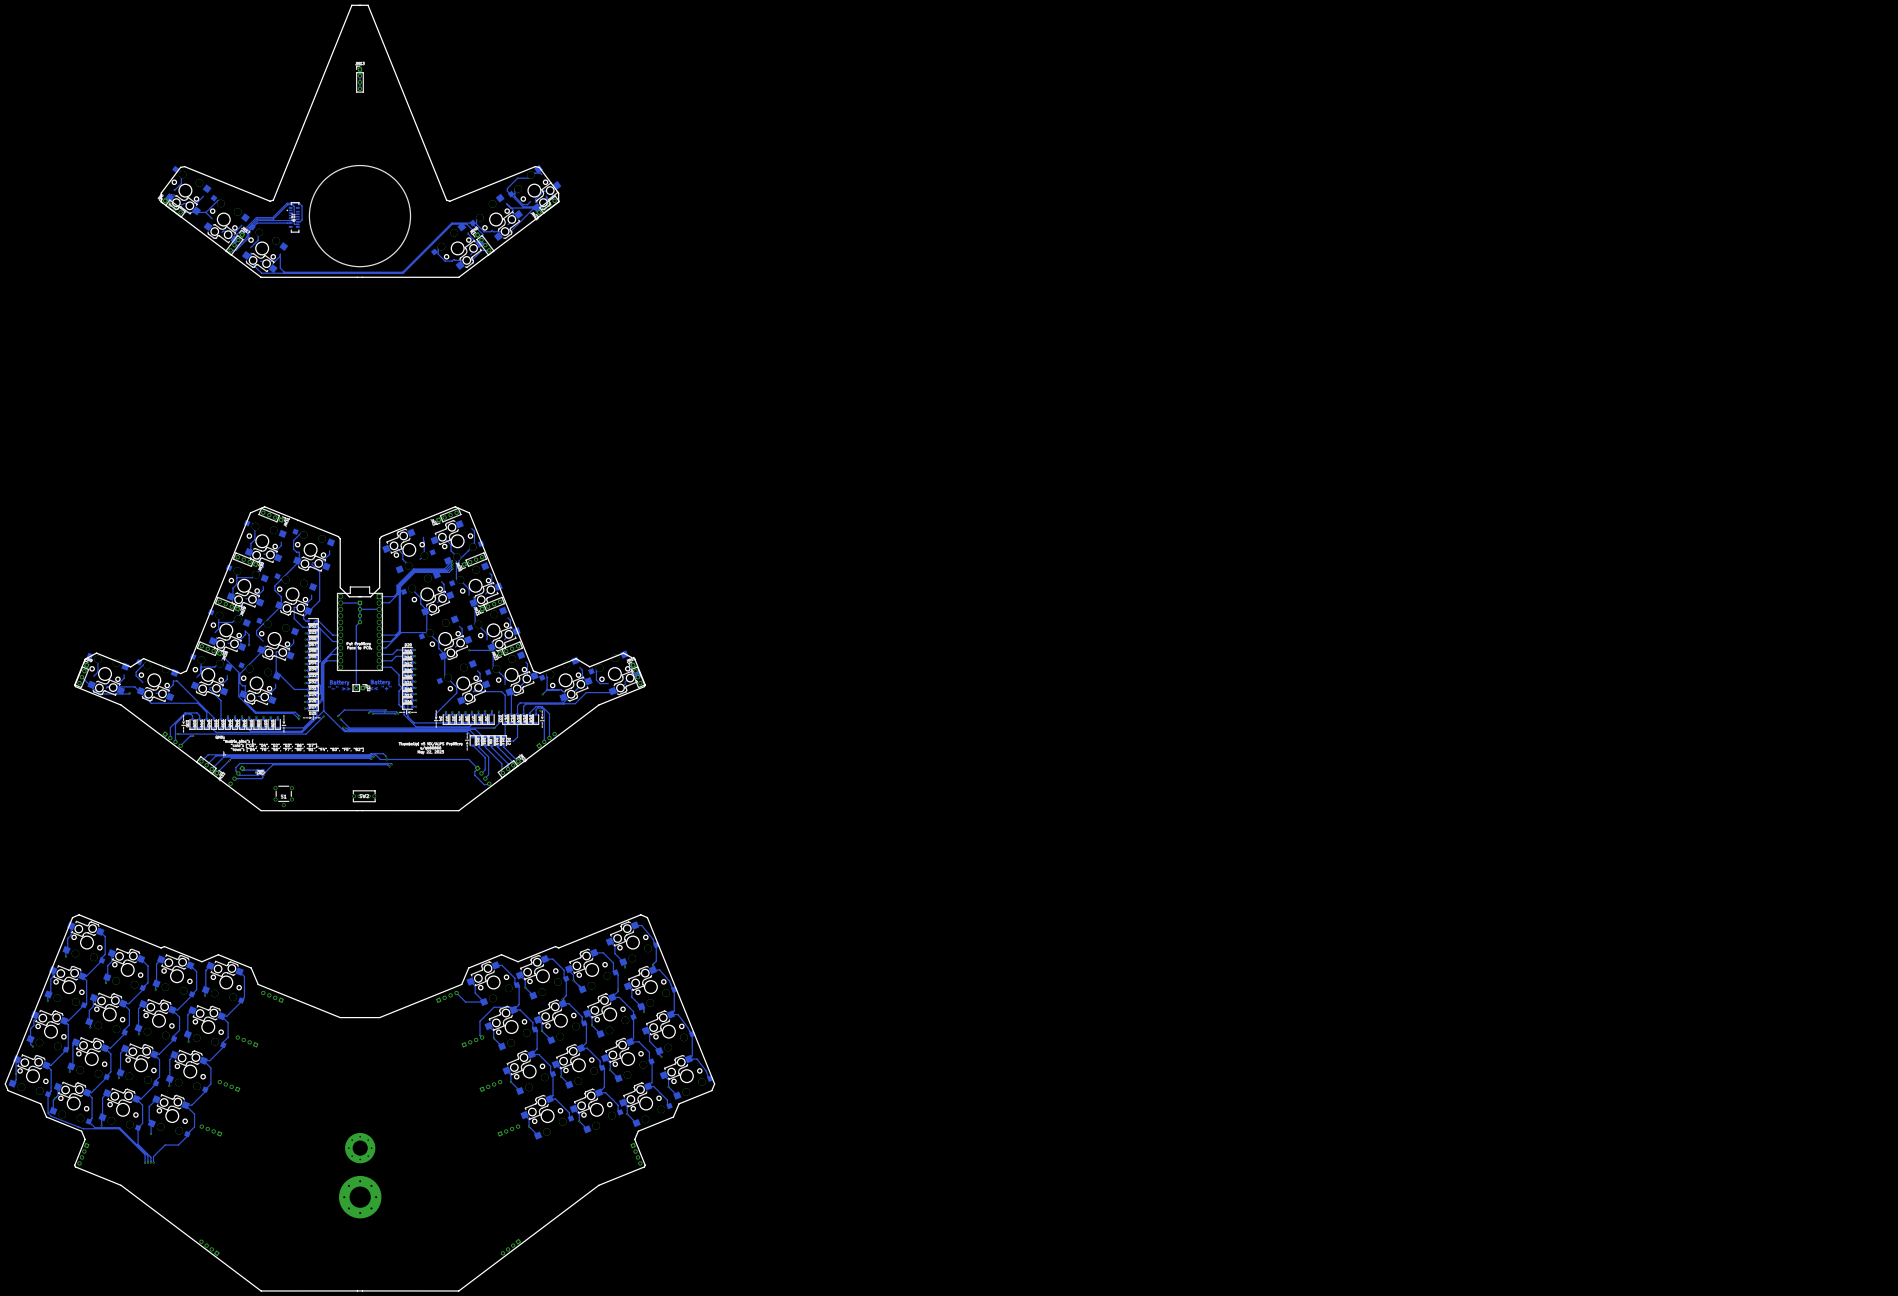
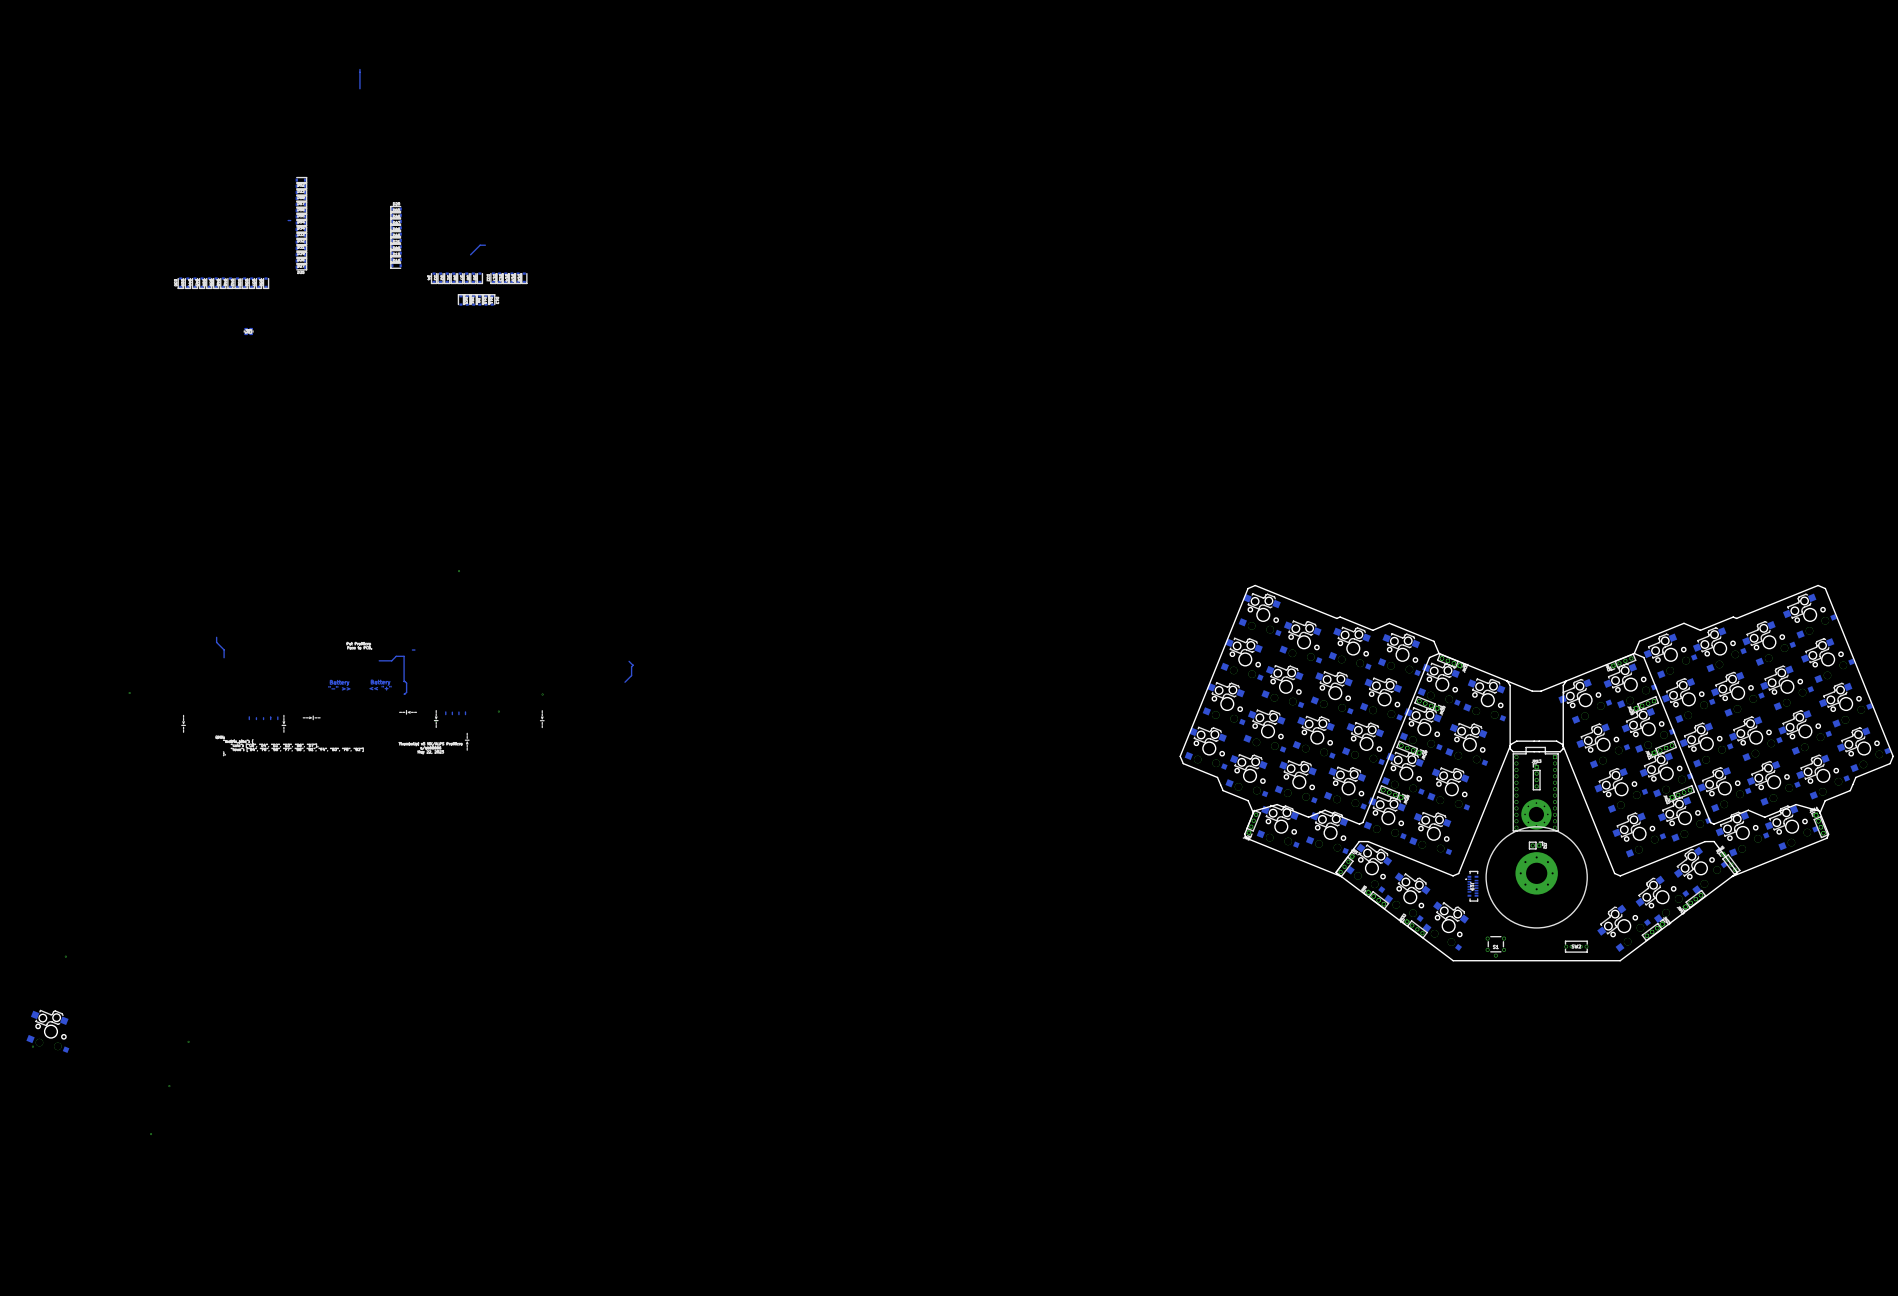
board edge: (368, 5) (351, 5) (273, 200) (270, 201) (184, 166) (180, 167) (161, 193) (161, 201) (261, 277) (458, 277) (558, 201) (558, 193) (539, 167) (535, 166) (449, 201) (446, 200) (368, 5) -> none
part position: (359, 79) -> (1536, 776)
drawing: [309, 165, 411, 267] -> none
track: (181, 171) (181, 183) (173, 189) -> none
track: (541, 174) (534, 173) (529, 178) (517, 178) (507, 188) (507, 191) (523, 206) (549, 204) (547, 202) (547, 196) -> none
part: (534, 188) -> none
track: (514, 189) (514, 196) (523, 204) (527, 204) (530, 201) -> none
part: (188, 190) -> none
track: (174, 194) (171, 194) (165, 200) -> none
track: (546, 195) (546, 198) -> none
track: (203, 196) (196, 203) (170, 204) -> none
track: (219, 200) (206, 212) (180, 212) -> none
track: (554, 200) (549, 191) (543, 191) (535, 199) (535, 202) -> none
track: (506, 203) (513, 210) (513, 219) (507, 224) -> none
part position: (547, 206) -> (1694, 901)
part position: (172, 207) -> (1376, 899)
track: (510, 208) (544, 208) -> none
track: (205, 212) (212, 218) -> none
track: (539, 212) (532, 209) (510, 231) (484, 231) (476, 224) (476, 218) -> none
part position: (293, 217) -> (1471, 886)
part: (496, 217) -> none
part: (226, 219) -> none
track: (288, 220) (257, 220) (247, 230) (247, 236) (238, 245) (234, 245) -> none
track: (297, 221) (302, 220) (302, 205) (299, 203) (287, 203) (272, 217) (256, 217) (236, 235) (238, 240) -> none
track: (290, 223) (257, 223) (248, 231) (248, 237) (235, 250) (230, 250) -> none
track: (297, 224) (294, 223) (294, 206) (287, 204) (273, 219) (257, 219) (242, 235) -> none
track: (241, 225) (235, 231) (221, 232) -> none
track: (258, 229) (258, 240) (250, 247) -> none
track: (468, 232) (479, 245) -> none
track: (477, 234) (466, 224) (452, 224) (403, 273) (261, 273) (251, 262) (251, 252) -> none
track: (481, 240) (482, 234) (471, 223) (451, 223) (402, 272) (284, 272) (280, 268) (280, 254) -> none
part position: (235, 242) -> (1345, 864)
part position: (483, 243) -> (1729, 863)
part: (457, 246) -> none
track: (438, 247) (438, 254) (445, 261) (453, 259) (472, 260) (481, 250) (489, 250) -> none
part: (265, 248) -> none
track: (280, 256) (275, 261) (260, 261) -> none
board edge: (455, 506) (381, 536) (379, 538) (379, 587) (370, 596) (349, 596) (340, 587) (340, 538) (338, 536) (264, 506) (250, 512) (186, 670) (180, 673) (143, 658) (130, 666) (96, 653) (85, 659) (75, 686) (121, 705) (261, 810) (458, 810) (598, 705) (645, 684) (634, 659) (623, 653) (589, 666) (576, 658) (539, 673) (533, 670) (469, 512) (455, 506) -> none
part position: (272, 515) -> (1450, 661)
part position: (448, 516) -> (1623, 662)
track: (253, 523) (254, 539) (250, 543) (250, 552) (263, 564) (263, 566) (252, 577) (236, 577) -> none
track: (471, 528) (474, 531) (474, 544) (459, 560) (459, 571) -> none
track: (301, 532) (293, 540) (293, 549) (299, 552) (299, 561) (274, 585) (274, 590) (281, 596) (281, 605) (256, 630) (256, 634) (263, 641) -> none
track: (439, 534) (451, 544) (451, 550) (456, 556) (456, 578) (469, 589) (469, 595) -> none
track: (423, 537) (424, 555) (420, 559) -> none
part: (265, 541) -> none
track: (281, 542) (281, 545) (272, 554) (263, 554) -> none
part: (457, 542) -> none
track: (390, 543) (402, 553) (402, 559) (408, 565) -> none
part: (313, 549) -> none
track: (329, 550) (329, 554) (321, 562) (312, 562) -> none
part: (409, 551) -> none
part position: (246, 560) -> (1428, 703)
part position: (473, 560) -> (1645, 704)
track: (452, 561) (444, 568) (413, 568) (396, 585) (396, 593) (394, 596) (379, 597) -> none
via: (452, 561) -> none
track: (452, 563) (446, 570) (414, 570) (398, 586) (398, 594) (389, 602) (379, 603) -> none
via: (452, 563) -> none
track: (311, 564) (319, 572) (319, 600) (303, 616) (305, 621) (308, 621) -> none
track: (452, 566) (447, 571) (414, 571) (399, 586) (399, 631) (395, 635) (379, 635) -> none
via: (452, 566) -> none
track: (235, 568) (236, 584) (232, 588) (232, 596) (243, 606) (243, 611) (232, 622) (218, 622) -> none
track: (452, 568) (449, 572) (414, 572) (400, 586) (400, 631) (390, 641) (379, 641) -> none
via: (452, 568) -> none
track: (489, 573) (491, 575) (491, 587) (485, 593) -> none
track: (441, 581) (444, 584) (444, 595) (437, 602) -> none
part: (475, 584) -> none
part: (247, 585) -> none
track: (263, 586) (263, 590) (254, 598) (245, 598) -> none
track: (408, 588) (420, 598) (420, 603) (426, 609) (426, 632) -> none
part: (427, 593) -> none
part: (295, 594) -> none
track: (311, 595) (311, 598) (303, 607) (294, 607) (294, 618) (302, 627) (308, 627) -> none
track: (473, 597) (475, 623) (487, 634) (487, 639) -> none
track: (340, 603) (359, 602) (359, 622) (356, 625) (356, 688) -> none
part position: (228, 604) -> (1410, 748)
part position: (491, 605) -> (1663, 749)
track: (359, 609) (379, 609) -> none
part: (359, 612) -> none
track: (218, 613) (218, 628) (214, 632) -> none
part: none -> (1260, 614)
part: none -> (1809, 616)
track: (507, 617) (510, 620) (510, 633) (504, 639) -> none
part position: (312, 621) -> (301, 180)
track: (459, 626) (462, 628) (462, 640) (455, 647) -> none
part position: (312, 627) -> (301, 186)
track: (316, 627) (332, 641) (340, 641) -> none
track: (320, 628) (320, 661) (316, 664) (316, 683) (320, 685) (320, 693) (316, 695) -> none
part: (359, 628) -> none
part: (493, 629) -> none
part: (229, 630) -> none
via: (305, 633) -> none
track: (308, 633) (305, 633) -> none
part position: (312, 633) -> (301, 192)
track: (340, 635) (332, 635) (318, 621) (315, 621) (316, 657) -> none
part: (445, 637) -> none
part: (277, 638) -> none
track: (293, 639) (293, 643) (285, 651) (276, 651) (276, 671) (294, 689) (308, 689) -> none
via: (305, 639) -> none
track: (308, 639) (305, 639) -> none
part position: (312, 639) -> (301, 198)
track: (491, 642) (493, 668) (505, 678) (505, 684) -> none
part: none -> (1300, 642)
track: (227, 643) (236, 643) (245, 634) (245, 631) (249, 634) (249, 645) -> none
part: none -> (1769, 643)
via: (249, 645) -> none
track: (264, 645) (264, 648) (239, 673) (239, 683) (245, 685) (245, 701) (255, 712) (295, 712) (299, 716) -> none
via: (305, 645) -> none
track: (308, 645) (305, 645) -> none
part position: (312, 645) -> (301, 204)
track: (340, 647) (336, 647) (321, 662) (321, 699) (318, 701) (314, 700) (314, 690) (316, 689) -> none
track: (379, 647) (385, 647) (401, 632) (428, 632) (438, 642) (438, 648) (444, 654) (444, 677) (456, 687) (456, 693) (435, 713) (435, 720) -> none
part: none -> (1350, 648)
part position: (210, 649) -> (1392, 792)
track: (489, 649) (469, 650) -> none
via: (489, 649) -> none
part position: (509, 649) -> (1681, 793)
part: none -> (1719, 649)
part position: (407, 650) -> (396, 209)
via: (414, 650) -> none
via: (469, 650) -> none
via: (305, 651) -> none
track: (308, 651) (305, 651) -> none
part position: (312, 651) -> (301, 210)
board edge: none -> (1439, 653) (1429, 657) (1362, 822) (1359, 824) (1325, 810) (1308, 817) (1277, 804) (1254, 811) (1244, 834) (1246, 838) (1341, 876)
board edge: none -> (1439, 653) (1507, 680)
board edge: none -> (1439, 653) (1433, 641) (1389, 623) (1372, 630) (1340, 617) (1336, 618) (1255, 585) (1248, 588) (1180, 756) (1183, 763) (1217, 777) (1223, 790) (1248, 800) (1253, 812)
board edge: none -> (1634, 653) (1566, 680)
board edge: none -> (1634, 653) (1639, 641) (1683, 623) (1700, 630) (1733, 617) (1736, 618) (1818, 585) (1825, 588) (1893, 756) (1890, 763) (1855, 777) (1850, 790) (1825, 800) (1820, 812)
board edge: none -> (1634, 653) (1643, 657) (1710, 822) (1713, 824) (1748, 810) (1764, 817) (1796, 804) (1819, 811) (1828, 834) (1826, 838) (1732, 876)
track: (340, 654) (331, 654) (322, 663) (322, 700) (316, 706) (316, 716) (301, 731) (250, 731) (249, 727) (221, 727) -> none
track: (379, 654) (392, 654) (396, 650) (405, 650) (407, 652) (407, 698) (405, 700) -> none
part: none -> (1399, 654)
track: (96, 656) (97, 658) (97, 672) (93, 676) -> none
part position: (407, 656) -> (396, 215)
track: (412, 656) (415, 656) -> none
via: (415, 656) -> none
part: none -> (1670, 656)
track: (199, 657) (201, 673) (196, 677) -> none
via: (305, 657) -> none
track: (308, 657) (305, 657) -> none
part position: (312, 657) -> (301, 216)
part: none -> (1242, 659)
track: (340, 660) (326, 660) (323, 663) (323, 710) -> none
part: none -> (1827, 660)
track: (145, 662) (136, 672) (136, 675) (142, 682) -> none
part position: (407, 662) -> (396, 221)
via: (415, 662) -> none
track: (525, 662) (527, 663) (527, 679) (511, 695) (511, 714) -> none
part: none -> (1451, 662)
via: (305, 664) -> none
track: (308, 664) (305, 664) -> none
part position: (312, 664) -> (301, 223)
track: (201, 667) (214, 667) (224, 657) (238, 672) (238, 696) (255, 713) (293, 713) (299, 719) -> none
track: (379, 667) (391, 667) (399, 674) (399, 684) (404, 687) -> none
track: (579, 667) (582, 670) (582, 683) (563, 702) (520, 702) (517, 705) (517, 714) -> none
track: (596, 667) (596, 680) (599, 683) (608, 683) -> none
part position: (407, 668) -> (396, 227)
track: (415, 668) (412, 668) -> none
via: (415, 668) -> none
via: (305, 670) -> none
track: (308, 670) (305, 670) -> none
part position: (312, 670) -> (301, 229)
track: (477, 670) (480, 673) (480, 684) (473, 691) (501, 691) (505, 695) (505, 714) -> none
part: (615, 672) -> none
part: (511, 673) -> none
track: (547, 673) (547, 689) (559, 689) -> none
part rotation: 0° (82, 674) -> 180° (1253, 823)
part position: (82, 674) -> (1253, 823)
part: (108, 674) -> none
track: (124, 674) (124, 678) (115, 686) (106, 686) -> none
part: (211, 674) -> none
part position: (636, 674) -> (1819, 824)
track: (227, 675) (227, 679) (218, 687) (209, 687) -> none
part position: (407, 675) -> (396, 234)
via: (415, 675) -> none
via: (305, 676) -> none
track: (308, 676) (305, 676) -> none
part position: (312, 676) -> (301, 235)
track: (81, 677) (98, 693) (129, 693) -> none
part: (565, 679) -> none
part: (157, 680) -> none
board edge: none -> (1566, 680) (1563, 685) (1563, 748) (1560, 751) (1513, 751) (1510, 748) (1510, 685) (1507, 680)
board edge: none -> (1566, 680) (1541, 691) (1532, 691) (1507, 680)
part position: (407, 681) -> (396, 240)
track: (412, 681) (415, 681) -> none
via: (415, 681) -> none
part: (463, 682) -> none
part: (259, 683) -> none
via: (305, 683) -> none
track: (308, 683) (305, 683) -> none
part position: (312, 683) -> (301, 242)
track: (625, 683) (616, 692) (586, 692) (575, 703) (525, 704) (523, 706) (523, 714) -> none
track: (275, 684) (275, 687) (267, 696) (258, 696) -> none
part: none -> (1439, 684)
part: none -> (1630, 685)
part: none -> (1282, 686)
track: (402, 687) (399, 690) (399, 704) (404, 706) (404, 714) (416, 726) (469, 726) (471, 722) (491, 722) -> none
part position: (407, 687) -> (396, 246)
track: (415, 687) (412, 687) -> none
via: (415, 687) -> none
part: none -> (1787, 687)
track: (106, 688) (134, 686) (151, 703) (197, 703) (206, 712) (206, 719) -> none
part position: (359, 688) -> (1535, 845)
track: (209, 689) (221, 700) (221, 719) -> none
part position: (312, 689) -> (301, 248)
track: (563, 692) (561, 689) (547, 689) (542, 694) -> none
track: (155, 693) (164, 693) (173, 684) (173, 681) (177, 681) (213, 719) -> none
part: none -> (1332, 693)
part position: (407, 694) -> (396, 253)
track: (415, 694) (412, 694) -> none
via: (415, 694) -> none
part: none -> (1737, 694)
via: (304, 695) -> none
track: (308, 695) (304, 695) -> none
part position: (312, 695) -> (301, 254)
part: none -> (1381, 699)
track: (405, 700) (407, 702) (407, 716) (414, 722) (465, 722) -> none
part position: (407, 700) -> (396, 259)
track: (416, 700) (412, 700) -> none
via: (416, 700) -> none
part: none -> (1484, 700)
part: none -> (1688, 700)
via: (305, 701) -> none
track: (308, 701) (305, 701) -> none
part position: (312, 701) -> (301, 261)
track: (316, 701) (313, 707) (313, 717) (303, 727) (256, 727) -> none
part: none -> (1585, 701)
part: none -> (1224, 703)
part: none -> (1428, 705)
part: none -> (1644, 705)
part: none -> (1845, 705)
part position: (407, 706) -> (396, 265)
track: (416, 706) (412, 706) -> none
via: (416, 706) -> none
via: (304, 708) -> none
track: (308, 708) (304, 708) -> none
part position: (312, 708) -> (301, 267)
track: (323, 710) (344, 731) (467, 731) (472, 737) -> none
track: (323, 710) (302, 732) (216, 732) (213, 727) (192, 727) -> none
track: (385, 710) (344, 710) (338, 716) -> none
via: (385, 710) -> none
track: (491, 710) (491, 714) -> none
via: (491, 710) -> none
via: (540, 710) -> none
via: (445, 711) -> none
via: (465, 711) -> none
track: (471, 711) (471, 714) -> none
via: (471, 711) -> none
track: (478, 711) (478, 714) -> none
via: (478, 711) -> none
track: (485, 711) (485, 714) -> none
via: (485, 711) -> none
track: (498, 711) (498, 723) (494, 728) (349, 728) (340, 719) -> none
track: (368, 712) (396, 711) (398, 713) -> none
via: (368, 712) -> none
via: (452, 712) -> none
via: (458, 712) -> none
track: (372, 713) (395, 713) -> none
via: (372, 713) -> none
via: (395, 713) -> none
via: (398, 713) -> none
track: (529, 714) (536, 706) (542, 706) (549, 713) (549, 738) -> none
track: (536, 714) (537, 707) (544, 710) (544, 741) -> none
track: (227, 716) (227, 719) -> none
via: (227, 716) -> none
track: (235, 716) (235, 719) -> none
via: (235, 716) -> none
track: (242, 716) (242, 719) -> none
via: (242, 716) -> none
via: (249, 716) -> none
via: (256, 716) -> none
via: (263, 716) -> none
via: (270, 716) -> none
via: (299, 716) -> none
track: (323, 716) (306, 734) (177, 734) -> none
via: (323, 716) -> none
via: (338, 716) -> none
via: (277, 717) -> none
track: (192, 719) (190, 714) (185, 714) (175, 724) (175, 741) -> none
track: (199, 719) (197, 712) (185, 712) (170, 727) (170, 738) -> none
via: (299, 719) -> none
via: (340, 719) -> none
part position: (445, 719) -> (434, 278)
part position: (452, 719) -> (440, 278)
part position: (458, 719) -> (447, 278)
part position: (465, 719) -> (453, 278)
part position: (471, 719) -> (460, 278)
part position: (478, 719) -> (466, 278)
part position: (485, 719) -> (473, 278)
part position: (491, 719) -> (479, 278)
part position: (505, 719) -> (493, 278)
part position: (511, 719) -> (499, 278)
part position: (517, 719) -> (505, 278)
part position: (523, 719) -> (511, 278)
part position: (529, 719) -> (518, 278)
part position: (536, 719) -> (524, 278)
track: (511, 722) (505, 722) (503, 737) (483, 737) (475, 729) (345, 728) -> none
track: (536, 722) (517, 722) (517, 737) (513, 741) (481, 741) (470, 730) (345, 730) (343, 727) -> none
part position: (192, 723) -> (180, 282)
part position: (199, 723) -> (187, 282)
part position: (206, 723) -> (194, 282)
part position: (213, 723) -> (202, 282)
part position: (221, 723) -> (209, 282)
part position: (227, 723) -> (216, 282)
part position: (235, 723) -> (223, 282)
part position: (242, 723) -> (230, 282)
part position: (249, 723) -> (237, 282)
part position: (256, 723) -> (244, 282)
part position: (263, 723) -> (251, 282)
part position: (270, 723) -> (258, 282)
part position: (277, 723) -> (266, 282)
via: (343, 727) -> none
via: (494, 727) -> none
via: (345, 728) -> none
part: none -> (1421, 729)
part: none -> (1648, 730)
part: none -> (1264, 731)
part: none -> (1805, 732)
via: (177, 734) -> none
track: (193, 736) (190, 736) (180, 745) -> none
via: (193, 736) -> none
part: none -> (1314, 737)
part: none -> (1755, 738)
part: (172, 739) -> none
part: (546, 740) -> none
part position: (472, 741) -> (460, 300)
part position: (479, 741) -> (467, 300)
part position: (485, 741) -> (473, 300)
part position: (491, 741) -> (479, 300)
part position: (497, 741) -> (486, 300)
part position: (503, 741) -> (492, 300)
part: none -> (1363, 743)
part: none -> (1466, 744)
track: (472, 745) (485, 757) (485, 769) (481, 773) -> none
track: (479, 745) (488, 756) (488, 774) (485, 778) -> none
track: (485, 745) (501, 763) (502, 773) -> none
track: (491, 745) (508, 763) (508, 769) -> none
track: (497, 745) (513, 762) (513, 765) -> none
track: (503, 745) (518, 761) -> none
part: none -> (1603, 745)
part: none -> (1706, 745)
part: none -> (1206, 748)
part: none -> (1410, 749)
part: none -> (1662, 749)
part: none -> (1863, 749)
track: (373, 756) (223, 757) (211, 769) -> none
via: (373, 756) -> none
track: (386, 756) (383, 753) (208, 754) (201, 761) -> none
via: (386, 756) -> none
track: (371, 758) (231, 758) (216, 773) -> none
via: (371, 758) -> none
via: (387, 759) -> none
via: (229, 760) -> none
track: (391, 764) (239, 763) (235, 767) (235, 771) (240, 775) (257, 774) -> none
via: (391, 764) -> none
track: (206, 765) (216, 755) (375, 754) (380, 759) (468, 759) (477, 768) (474, 775) (484, 784) (489, 783) -> none
part rotation: 0° (209, 766) -> 180° (1414, 928)
part position: (209, 766) -> (1414, 928)
track: (389, 766) (387, 764) (272, 764) (261, 778) (234, 778) -> none
via: (389, 766) -> none
part position: (509, 767) -> (1653, 930)
track: (242, 768) (243, 770) (262, 770) -> none
part position: (257, 772) -> (246, 331)
part position: (262, 772) -> (251, 331)
part: none -> (1403, 773)
part: none -> (1666, 774)
part: (236, 775) -> none
part: (483, 775) -> none
part: none -> (1246, 775)
part: none -> (1823, 777)
part: none -> (1296, 782)
part: none -> (1773, 783)
part: none -> (1345, 788)
part: none -> (1448, 789)
part: none -> (1535, 789)
part: none -> (1724, 789)
part: none -> (1621, 790)
part: none -> (1392, 794)
part: none -> (1680, 794)
part position: (283, 796) -> (1495, 947)
part position: (364, 796) -> (1576, 946)
part: none -> (1536, 814)
part: none -> (1385, 818)
part: none -> (1684, 819)
part: none -> (1819, 823)
part: none -> (1278, 826)
drawing: none -> [1485, 826, 1588, 929]
part: none -> (1791, 827)
part: none -> (1327, 832)
part: none -> (1430, 833)
part: none -> (1639, 834)
part: none -> (1742, 834)
part: none -> (1369, 868)
part: none -> (1700, 870)
part: none -> (1536, 873)
board edge: none -> (1732, 876) (1737, 872) (1714, 841) (1705, 841) (1620, 875) (1614, 873) (1562, 744) (1556, 741) (1516, 741) (1510, 744) (1458, 873) (1453, 875) (1368, 841) (1359, 841) (1336, 872) (1341, 876)
board edge: none -> (1732, 876) (1620, 960) (1453, 960) (1341, 876)
part: none -> (1375, 897)
part: none -> (1407, 897)
part: none -> (1662, 899)
part: none -> (1692, 901)
board edge: (640, 914) (647, 917) (714, 1084) (711, 1090) (679, 1103) (673, 1117) (638, 1131) (634, 1139) (644, 1166) (598, 1185) (458, 1290) (261, 1290) (121, 1185) (75, 1166) (85, 1139) (81, 1131) (46, 1117) (40, 1103) (8, 1090) (5, 1084) (72, 917) (79, 914) (161, 947) (164, 946) (201, 961) (218, 954) (251, 968) (258, 984) (340, 1017) (379, 1017) (461, 984) (468, 968) (501, 954) (518, 961) (555, 946) (558, 947) (640, 914) -> none
track: (71, 925) (71, 935) (67, 938) (65, 956) -> none
track: (634, 925) (641, 925) (653, 939) (656, 945) (656, 961) (652, 964) (652, 970) (659, 970) (674, 989) (674, 1011) (670, 1014) (678, 1014) (692, 1034) (692, 1055) (688, 1059) (697, 1059) (710, 1078) -> none
part: none -> (1445, 926)
part: none -> (1624, 928)
part: none -> (1655, 929)
track: (100, 931) (105, 936) (105, 954) (102, 960) (86, 976) (82, 976) (86, 980) (86, 1004) (68, 1020) (64, 1020) (68, 1024) (68, 1047) (51, 1065) (46, 1065) (51, 1070) (51, 1091) (48, 1094) (48, 1113) (51, 1116) (83, 1128) (119, 1128) (145, 1154) (145, 1162) -> none
track: (609, 941) (614, 946) (614, 953) (624, 963) (624, 967) -> none
part: (83, 942) -> none
part: (632, 943) -> none
track: (594, 952) (603, 952) (613, 963) (613, 970) (618, 975) (618, 991) (612, 997) (619, 997) (633, 1011) (633, 1038) (630, 1041) (639, 1041) (649, 1052) (649, 1059) (652, 1062) (652, 1082) (648, 1086) (653, 1086) (667, 1100) (669, 1106) -> none
track: (111, 953) (111, 961) (107, 965) (105, 983) -> none
track: (141, 959) (148, 966) (148, 982) (129, 1003) (123, 1003) (129, 1009) (129, 1024) (124, 1029) (124, 1033) (110, 1048) (105, 1048) (110, 1053) (110, 1071) (91, 1092) (87, 1092) (92, 1097) (92, 1118) (88, 1121) (94, 1127) (119, 1127) (147, 1155) (147, 1162) -> none
track: (161, 959) (156, 964) (155, 989) -> none
track: (544, 959) (552, 959) (564, 970) (566, 995) (562, 999) (562, 1003) (568, 1003) (582, 1016) (582, 1021) (586, 1025) (586, 1042) (580, 1048) (587, 1048) (600, 1061) (600, 1065) (604, 1069) (604, 1087) (598, 1092) (605, 1092) (618, 1105) (620, 1112) -> none
via: (652, 964) -> none
track: (190, 965) (196, 971) (196, 989) (177, 1009) (172, 1009) (179, 1017) (179, 1030) (174, 1035) (174, 1039) (158, 1054) (154, 1054) (159, 1059) (159, 1076) (156, 1080) (156, 1083) (141, 1098) (136, 1098) (142, 1105) (142, 1123) (138, 1127) (138, 1144) (150, 1157) (150, 1162) -> none
track: (210, 965) (205, 970) (205, 995) -> none
track: (495, 965) (502, 965) (514, 978) (514, 982) (519, 987) (519, 1004) (513, 1009) -> none
via: (624, 967) -> none
track: (569, 968) (573, 975) (573, 980) (582, 989) -> none
part: (124, 969) -> none
track: (53, 970) (47, 1000) -> none
track: (239, 971) (244, 976) (244, 997) (226, 1016) (221, 1016) (228, 1022) (228, 1037) (223, 1042) (223, 1047) (209, 1060) (203, 1060) (210, 1067) (210, 1084) (191, 1105) (185, 1105) (194, 1114) (194, 1126) (178, 1145) (165, 1145) (153, 1156) (153, 1162) -> none
part: (591, 971) -> none
track: (519, 975) (525, 980) (525, 987) (533, 995) -> none
part: (173, 976) -> none
part: (542, 977) -> none
via: (573, 980) -> none
track: (470, 981) (475, 986) (475, 993) (484, 1002) (465, 1002) (456, 993) -> none
part: (223, 982) -> none
via: (105, 983) -> none
part: (493, 983) -> none
track: (627, 986) (631, 990) (631, 997) (644, 1009) (644, 1011) -> none
part: (65, 987) -> none
via: (525, 987) -> none
part: (650, 988) -> none
via: (155, 989) -> none
via: (618, 989) -> none
via: (205, 995) -> none
part: (272, 996) -> none
part: (447, 996) -> none
track: (93, 997) (93, 1006) (89, 1010) (90, 1027) -> none
via: (562, 999) -> none
via: (47, 1000) -> none
track: (143, 1004) (138, 1008) (138, 1034) -> none
track: (513, 1009) (520, 1009) (532, 1022) (532, 1027) (537, 1031) (537, 1049) (531, 1054) (538, 1054) (550, 1066) (550, 1071) (552, 1074) (552, 1095) (549, 1099) (555, 1099) (569, 1112) (570, 1118) -> none
track: (513, 1009) (510, 1007) (494, 1007) (479, 1021) (479, 1035) (482, 1037) -> none
track: (192, 1010) (187, 1014) (188, 1041) -> none
via: (644, 1011) -> none
track: (587, 1013) (592, 1018) (592, 1025) (600, 1033) -> none
track: (35, 1014) (36, 1017) (30, 1028) (30, 1044) (32, 1046) -> none
part: (106, 1014) -> none
part: (609, 1015) -> none
track: (537, 1019) (541, 1023) (541, 1030) (551, 1040) -> none
part: (155, 1020) -> none
part: (560, 1021) -> none
via: (592, 1025) -> none
track: (488, 1026) (493, 1031) (493, 1038) (502, 1046) -> none
via: (90, 1027) -> none
part: (205, 1027) -> none
part: (511, 1028) -> none
via: (541, 1030) -> none
track: (645, 1030) (649, 1034) (649, 1041) (659, 1051) (661, 1056) -> none
part: (668, 1032) -> none
via: (138, 1034) -> none
via: (493, 1038) -> none
part: (247, 1041) -> none
part: (472, 1041) -> none
track: (75, 1042) (72, 1045) (72, 1066) (69, 1067) (69, 1071) -> none
track: (125, 1048) (120, 1053) (118, 1078) -> none
track: (174, 1054) (169, 1059) (169, 1086) -> none
via: (661, 1056) -> none
part: (88, 1058) -> none
track: (605, 1058) (610, 1063) (610, 1070) (618, 1078) -> none
track: (17, 1059) (16, 1080) (12, 1083) -> none
part: (627, 1060) -> none
track: (555, 1064) (561, 1069) (561, 1076) (569, 1084) -> none
part: (137, 1065) -> none
part: (578, 1066) -> none
track: (506, 1070) (510, 1074) (510, 1081) (520, 1091) -> none
via: (610, 1070) -> none
via: (69, 1071) -> none
part: (187, 1071) -> none
part: (529, 1072) -> none
via: (16, 1073) -> none
track: (663, 1075) (668, 1079) (668, 1086) (677, 1095) -> none
part: (29, 1076) -> none
via: (561, 1076) -> none
part: (686, 1077) -> none
via: (118, 1078) -> none
via: (510, 1081) -> none
track: (57, 1086) (57, 1095) (53, 1100) (53, 1110) -> none
part: (229, 1086) -> none
part: (490, 1086) -> none
via: (668, 1086) -> none
track: (107, 1093) (102, 1097) (101, 1125) -> none
via: (55, 1098) -> none
track: (156, 1099) (149, 1106) (151, 1134) -> none
track: (623, 1102) (627, 1106) (627, 1114) -> none
part: (70, 1103) -> none
part: (645, 1104) -> none
track: (573, 1108) (579, 1114) (579, 1121) (587, 1129) -> none
part: (119, 1109) -> none
part: (596, 1110) -> none
track: (627, 1114) (636, 1123) -> none
via: (627, 1114) -> none
track: (524, 1115) (529, 1119) (529, 1126) (538, 1135) -> none
part: (169, 1116) -> none
part: (547, 1117) -> none
via: (579, 1121) -> none
via: (101, 1125) -> none
via: (529, 1126) -> none
part: (211, 1130) -> none
part: (508, 1130) -> none
part: (360, 1148) -> none
part: (83, 1154) -> none
part: (636, 1154) -> none
via: (145, 1162) -> none
via: (147, 1162) -> none
via: (150, 1162) -> none
via: (153, 1162) -> none
part: (360, 1197) -> none
part: (209, 1247) -> none
part: (511, 1247) -> none

